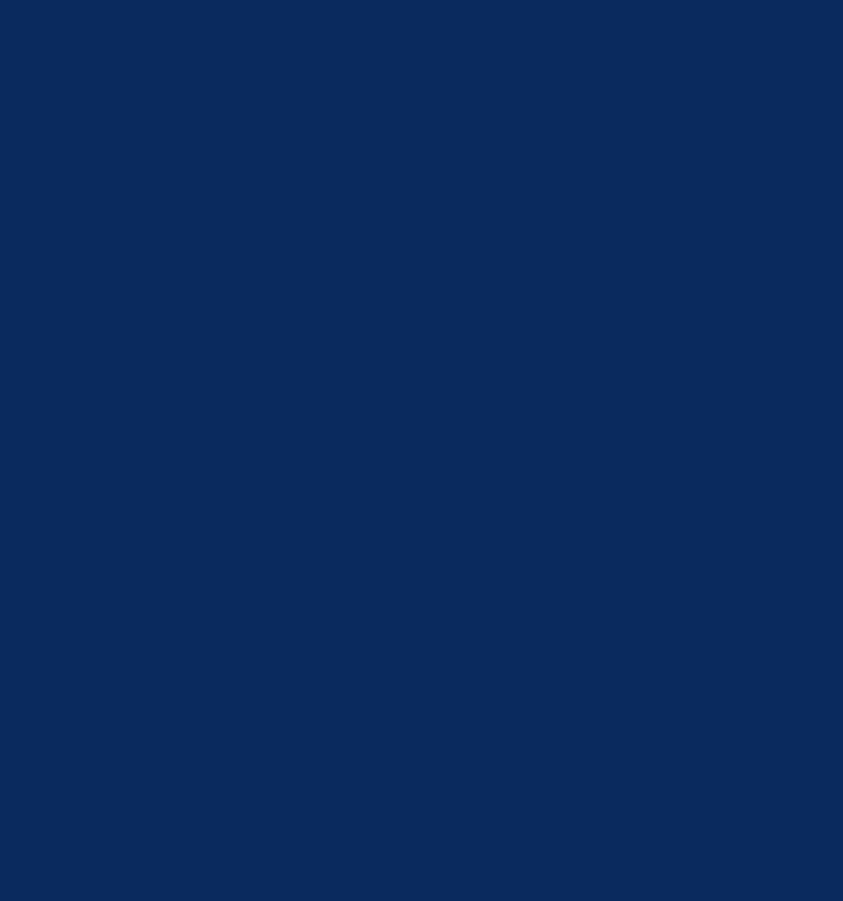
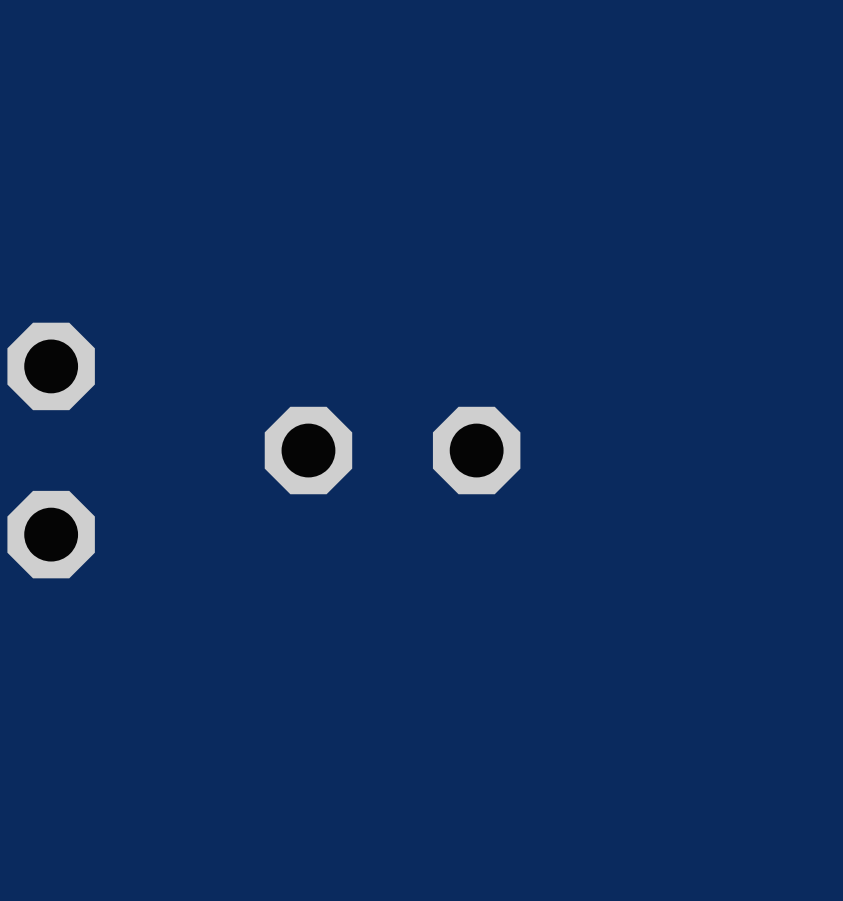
part: none -> (51, 450)
part: none -> (392, 450)

